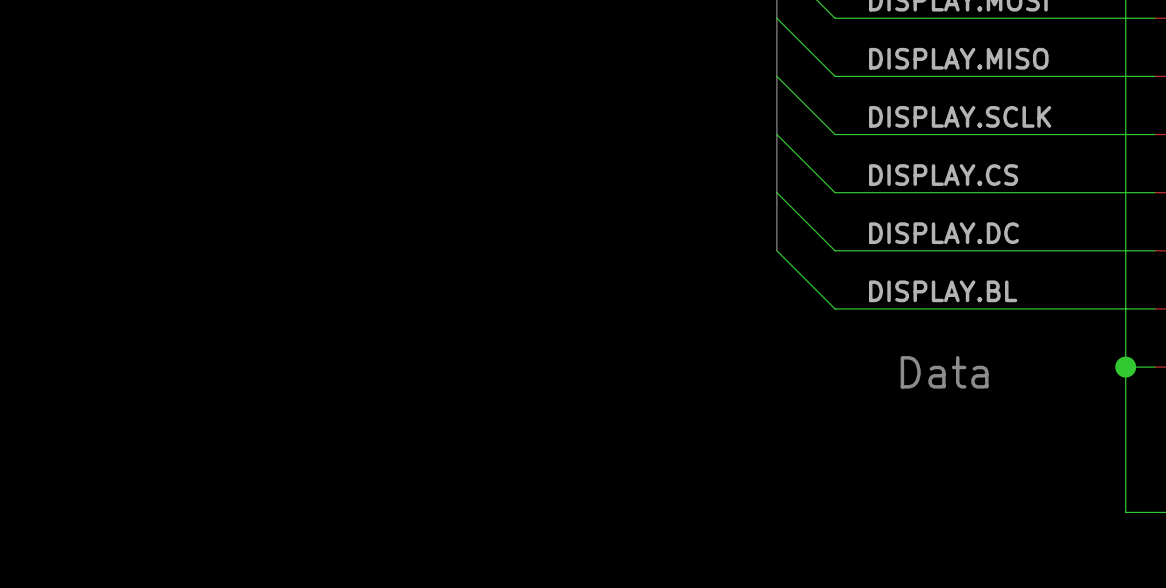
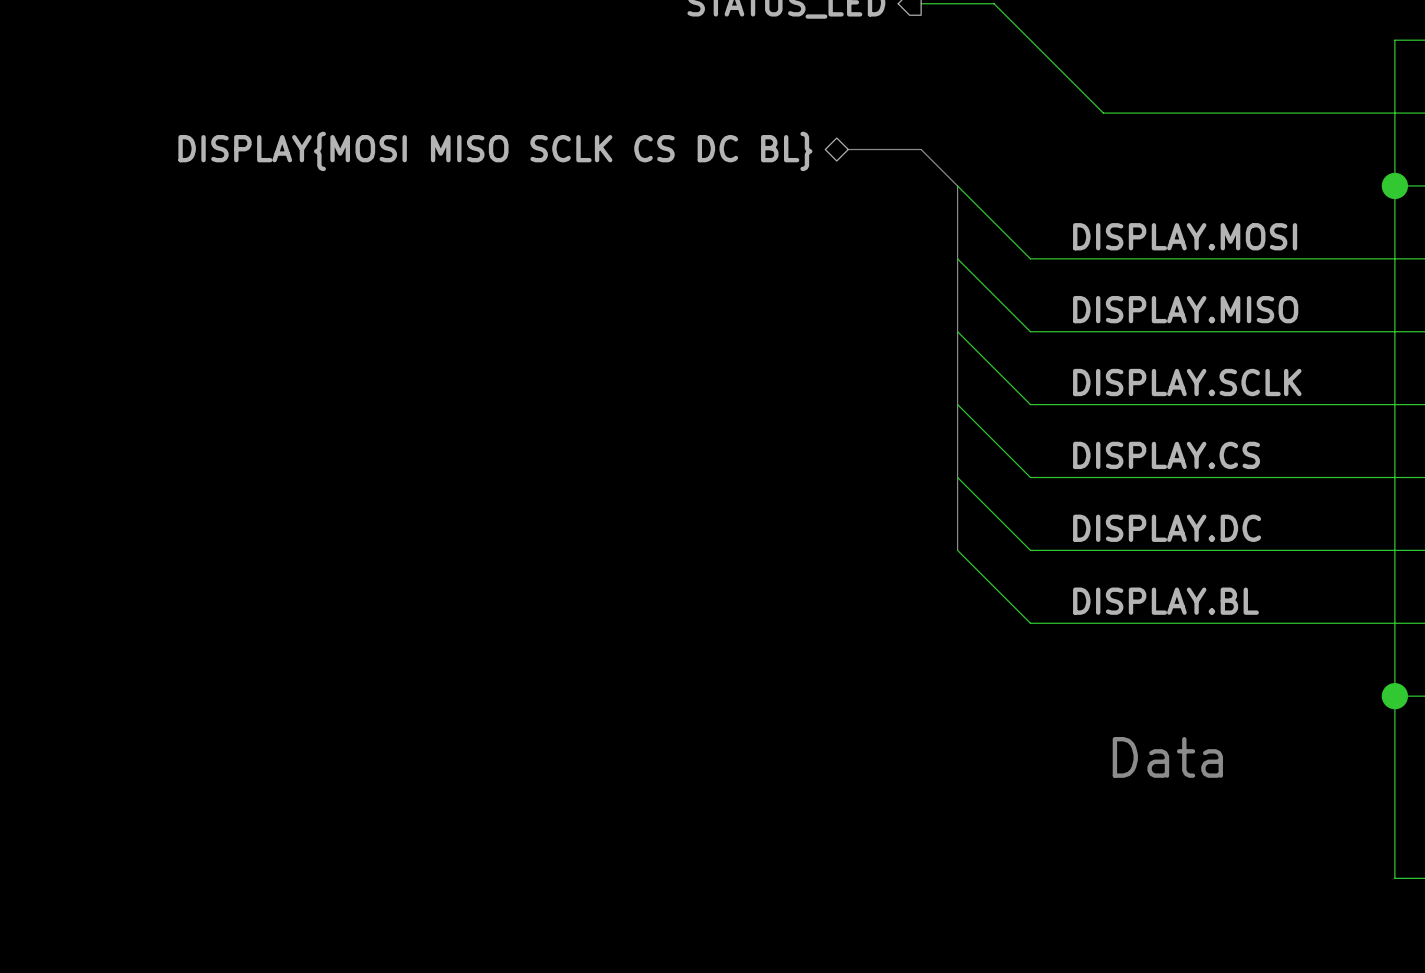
text position: Data (944, 372) -> Data (1167, 757)

